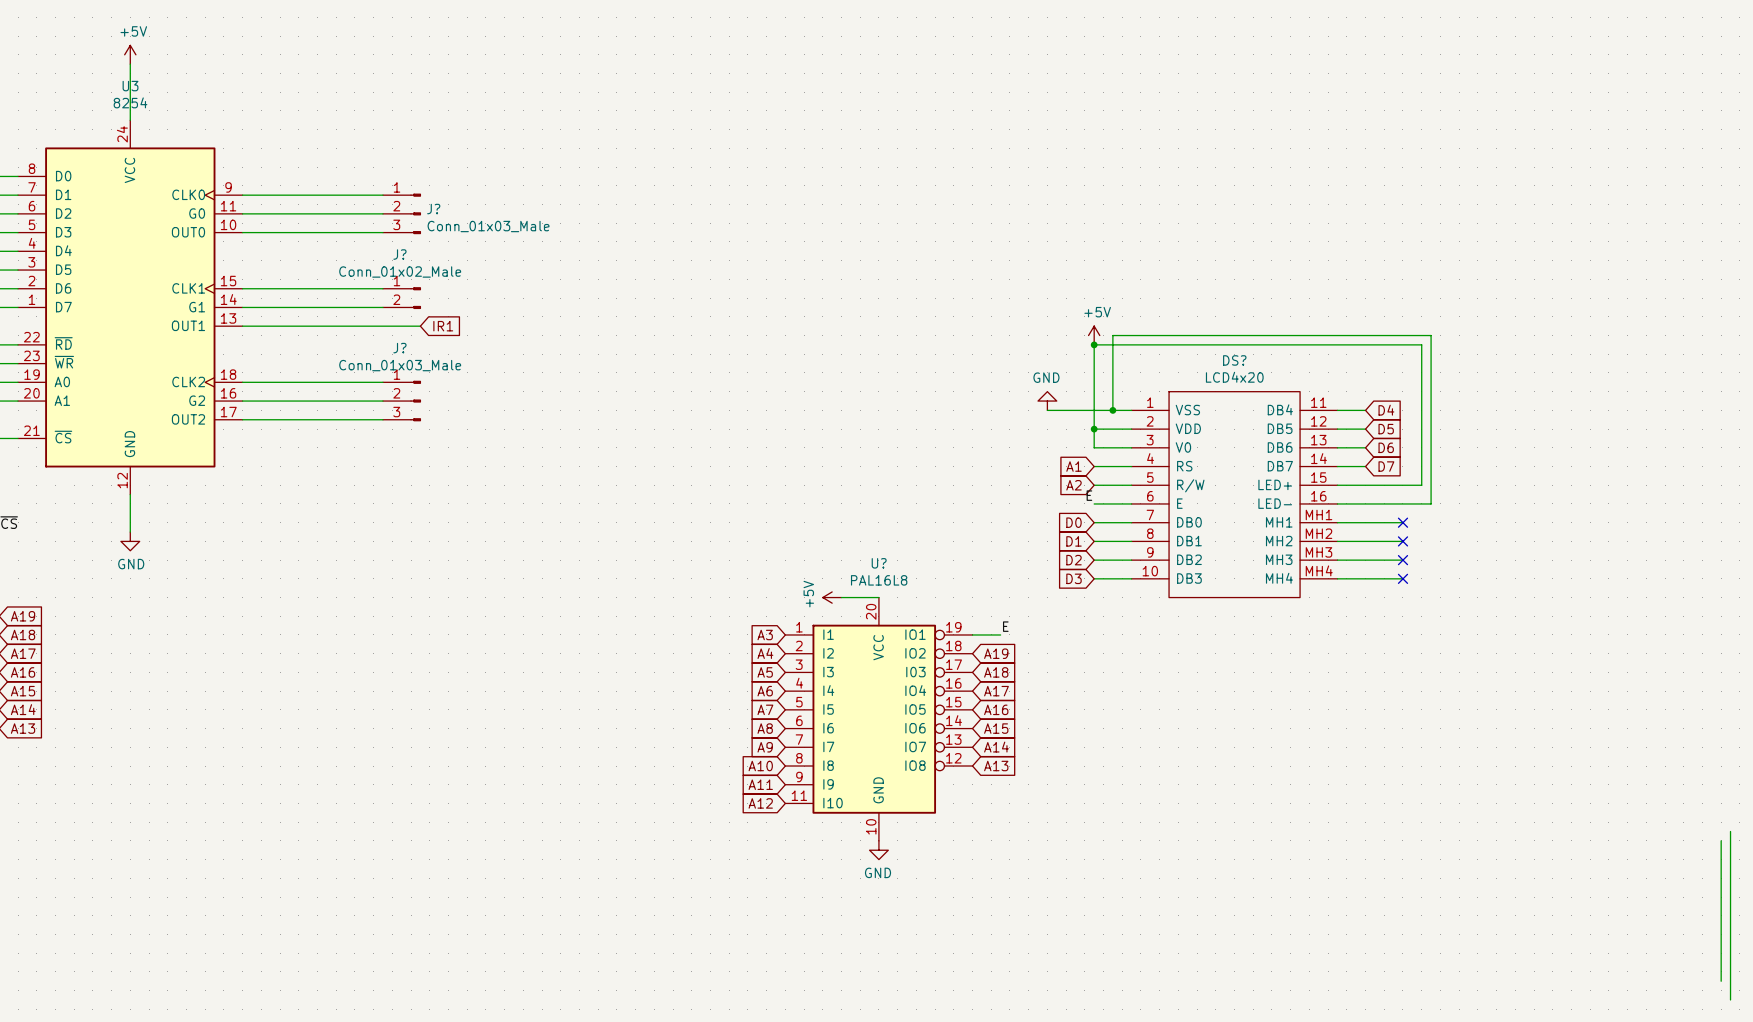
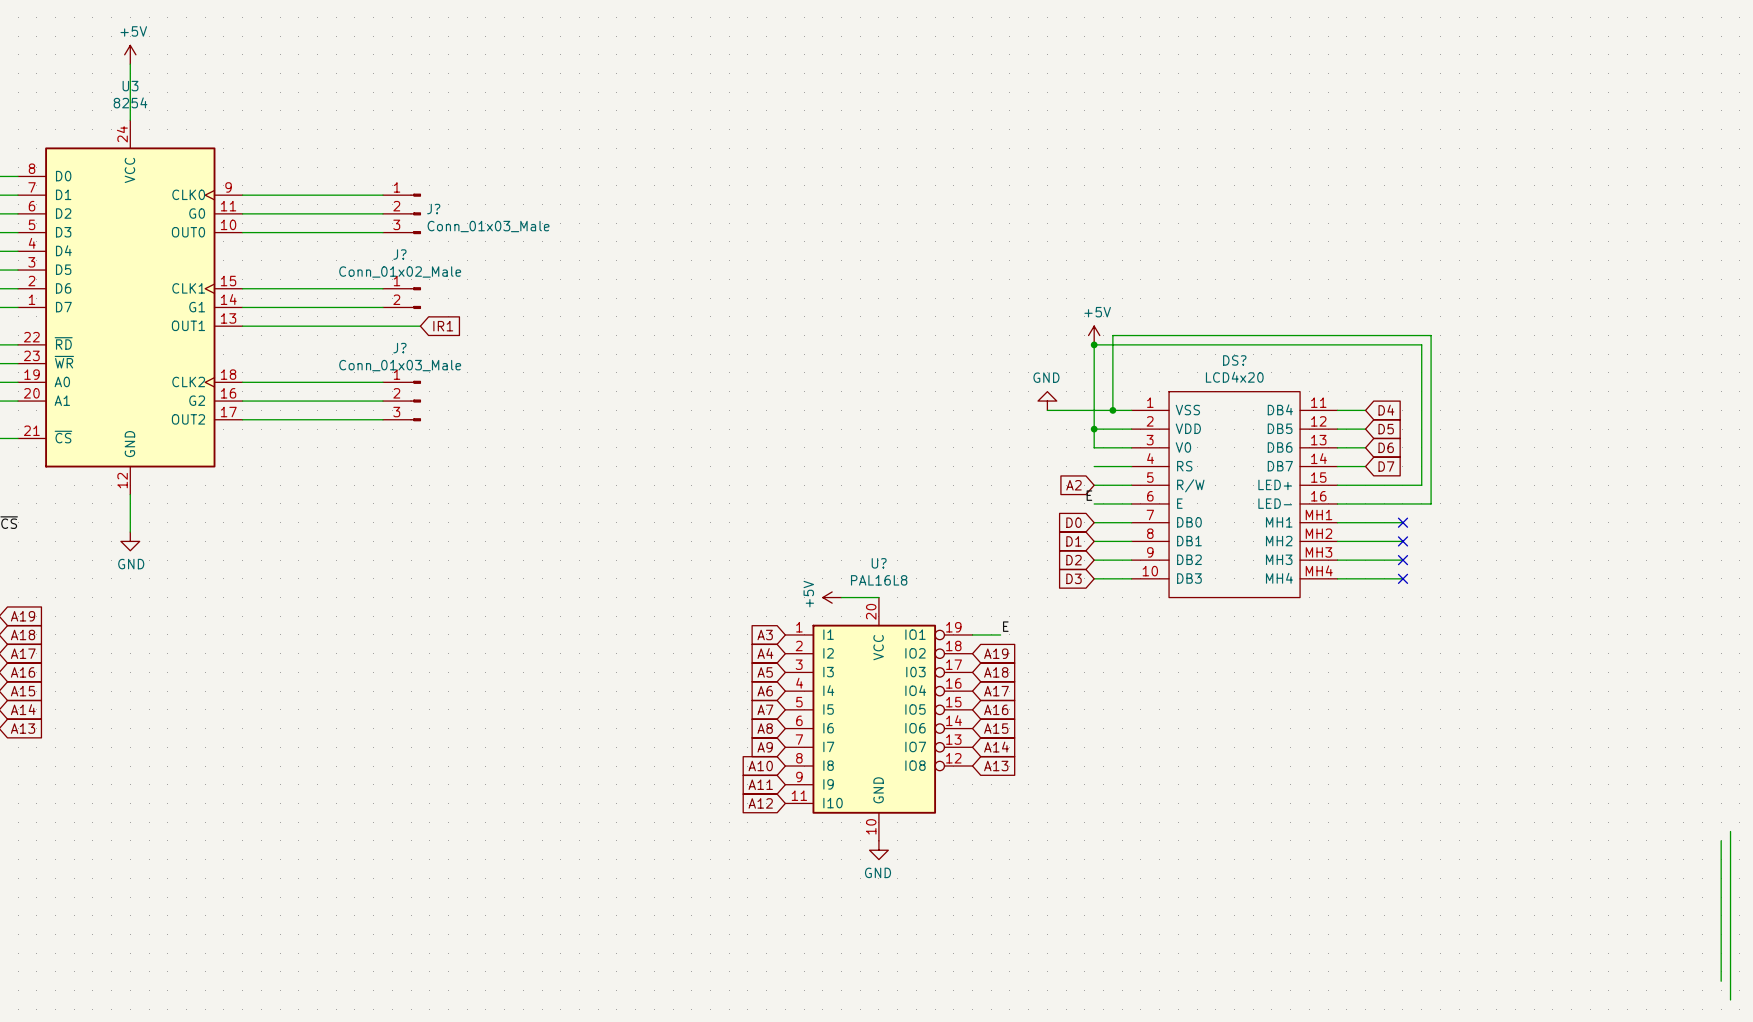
global label: A1 (1074, 466) -> none

